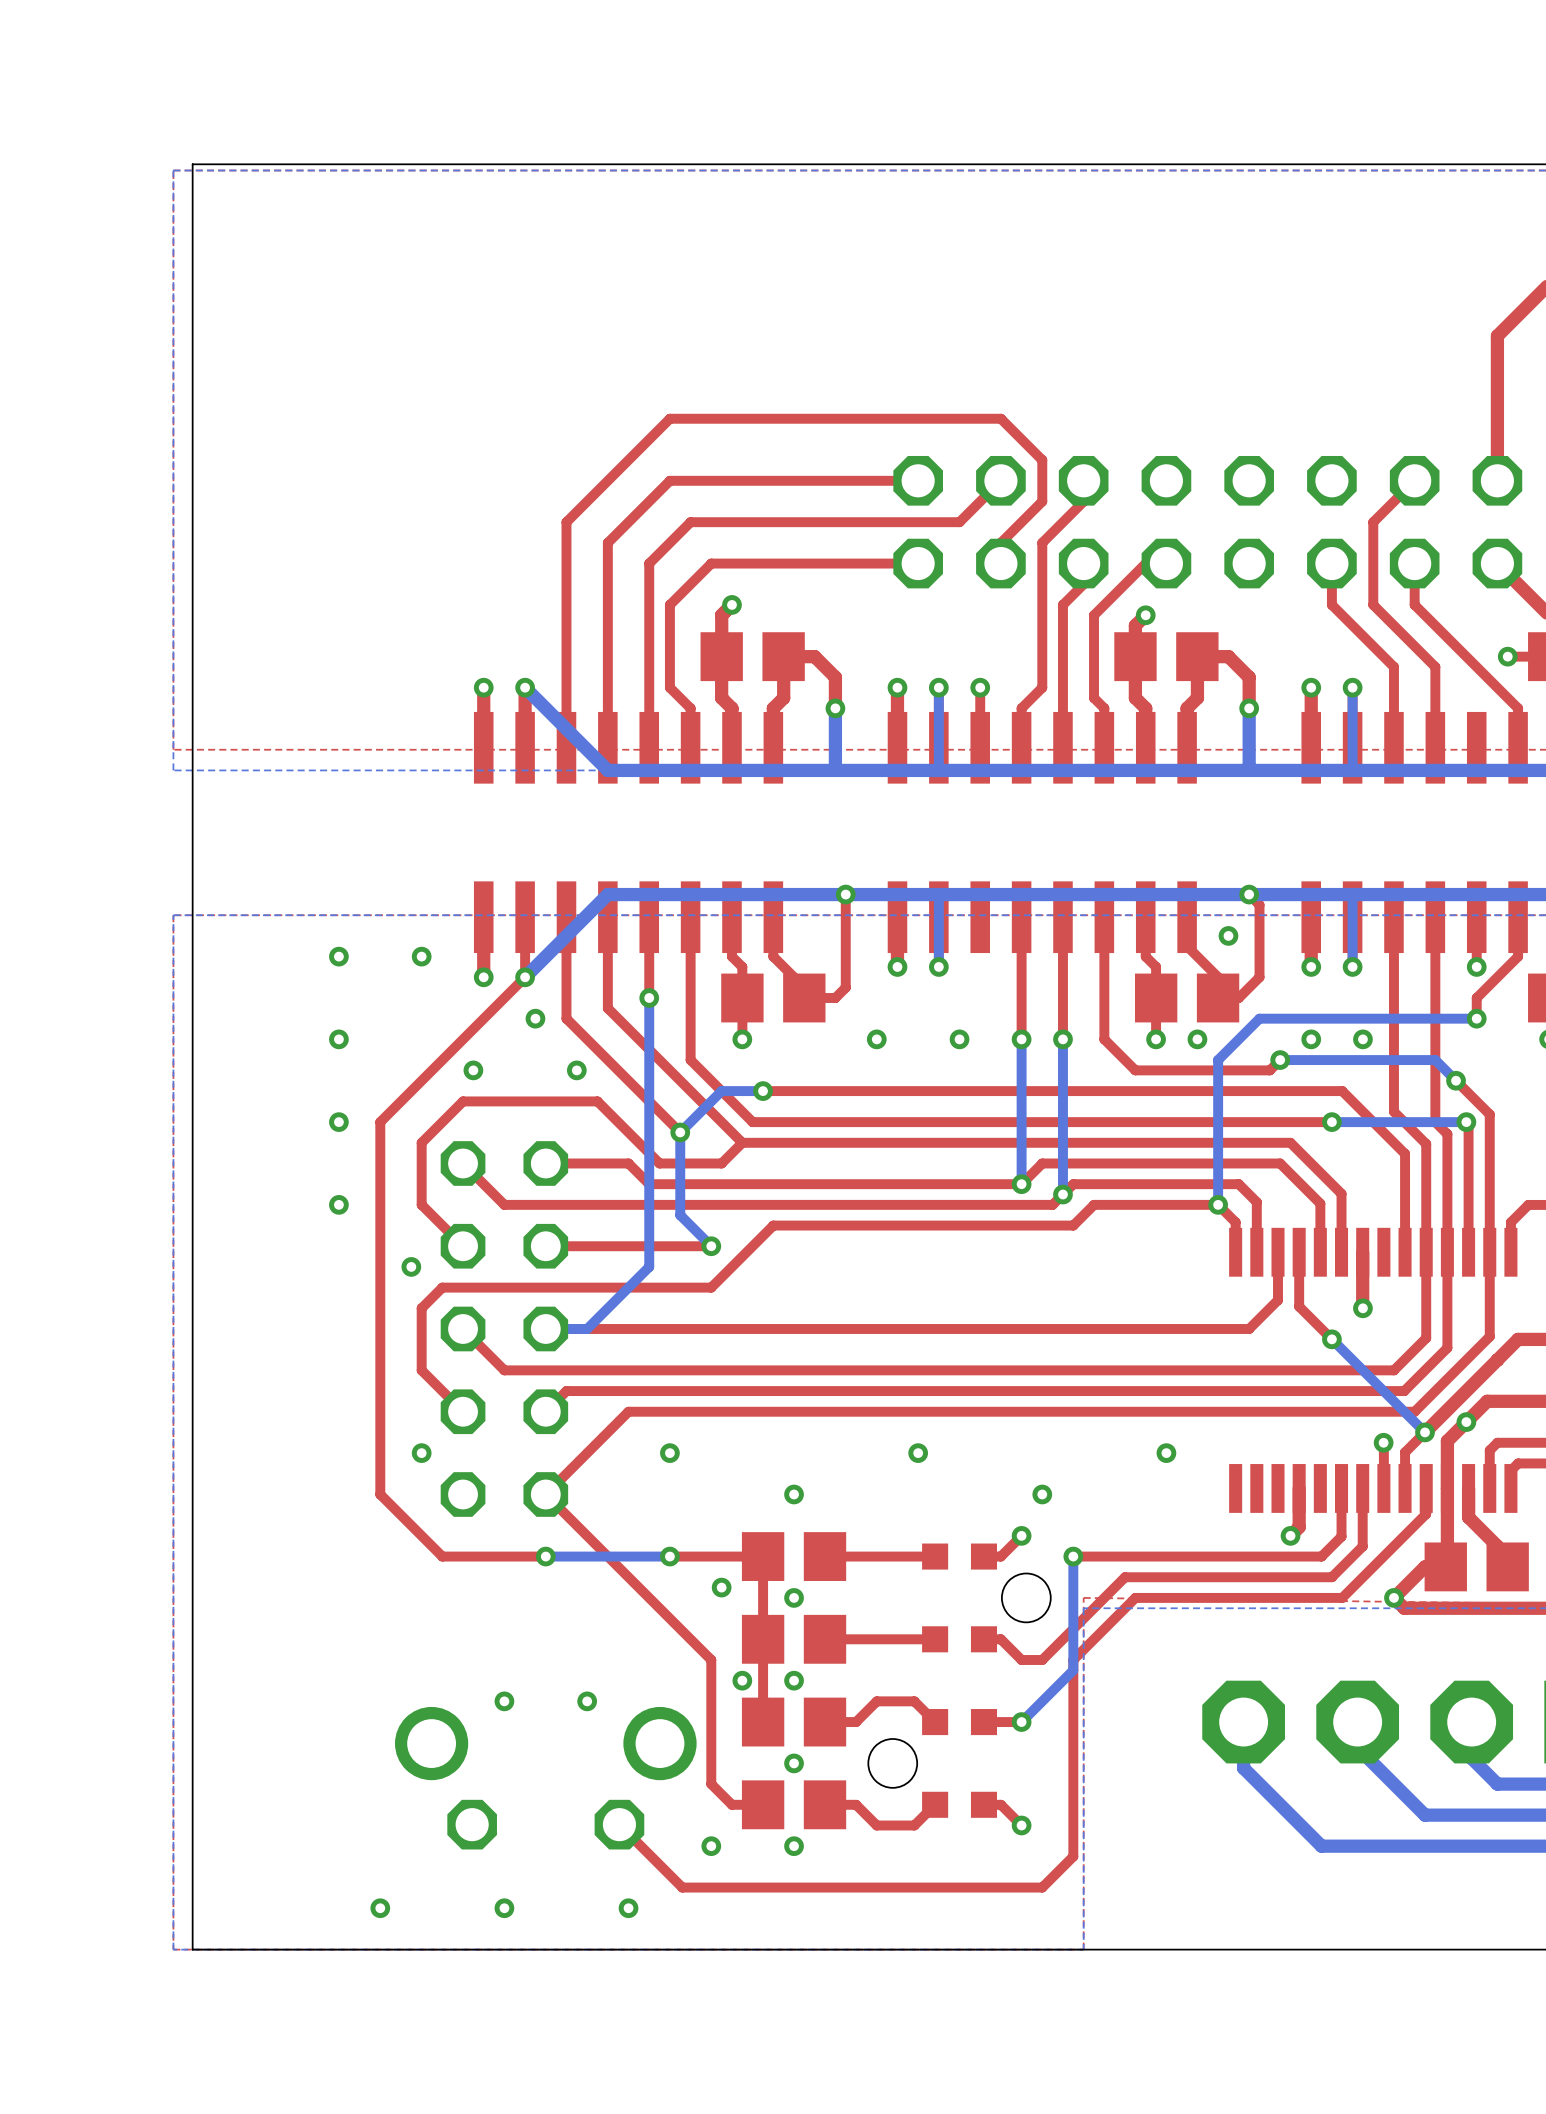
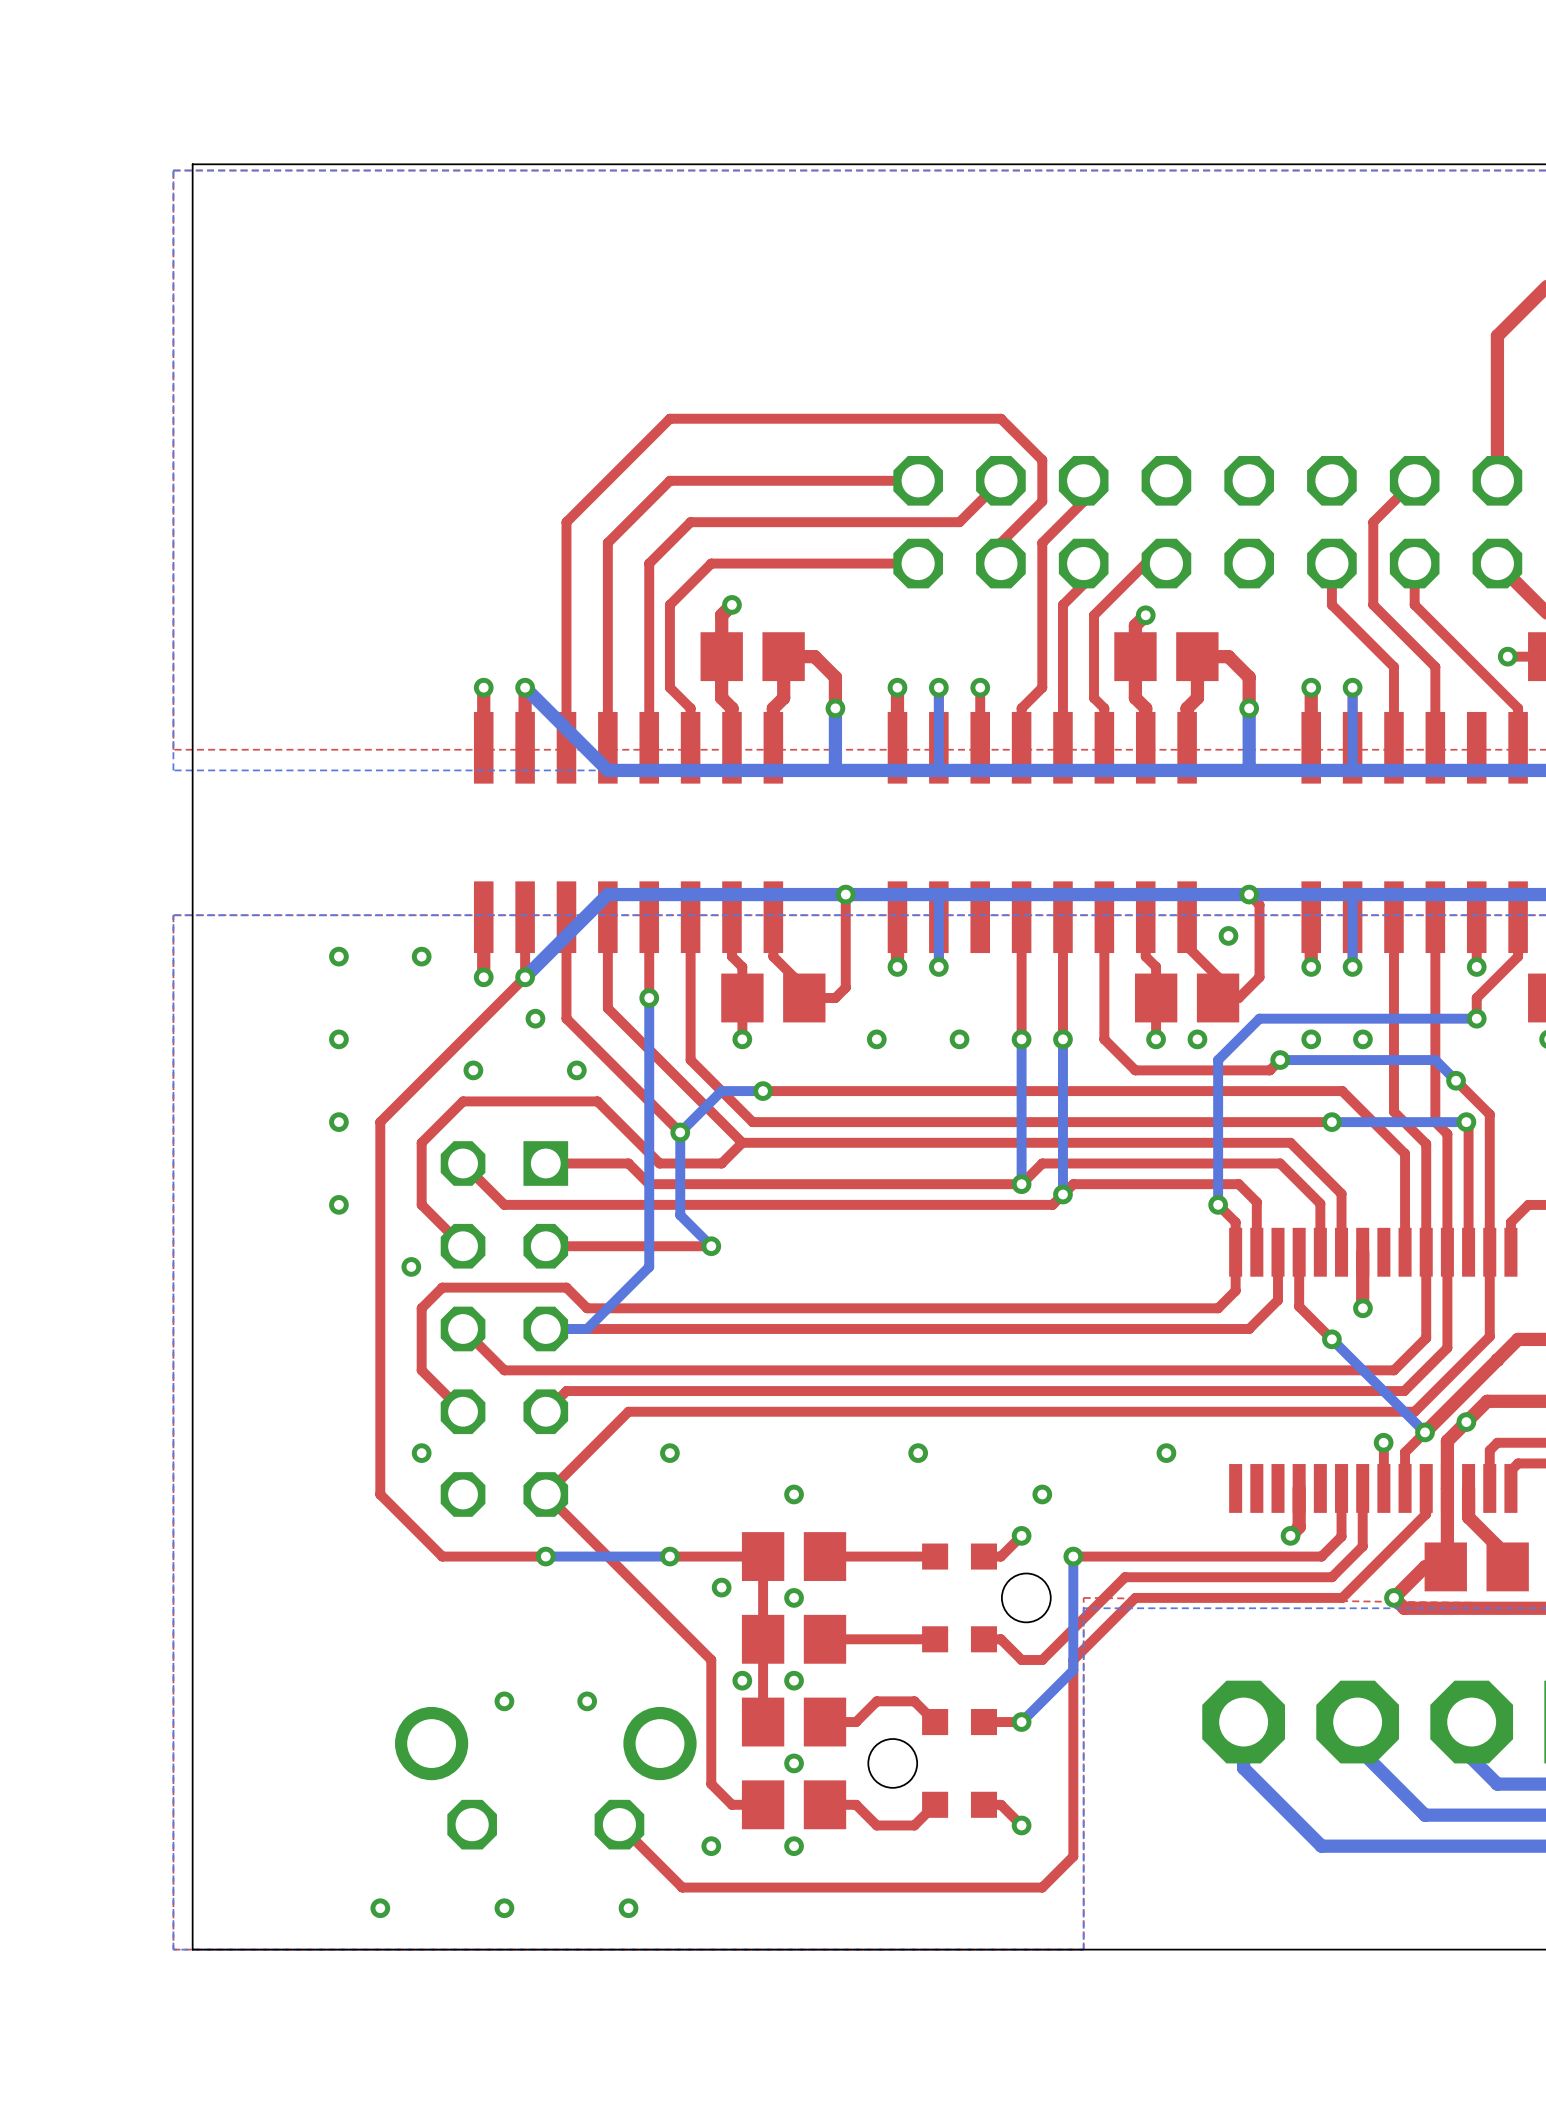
part footprint: [440, 1141, 569, 1517] -> [440, 1141, 569, 1517]
top track: (1218, 1204) (1094, 1204) (1073, 1225) (773, 1225) (711, 1287) (566, 1287) -> (1235, 1252) (1235, 1290) (1218, 1308) (587, 1308) (566, 1287)

